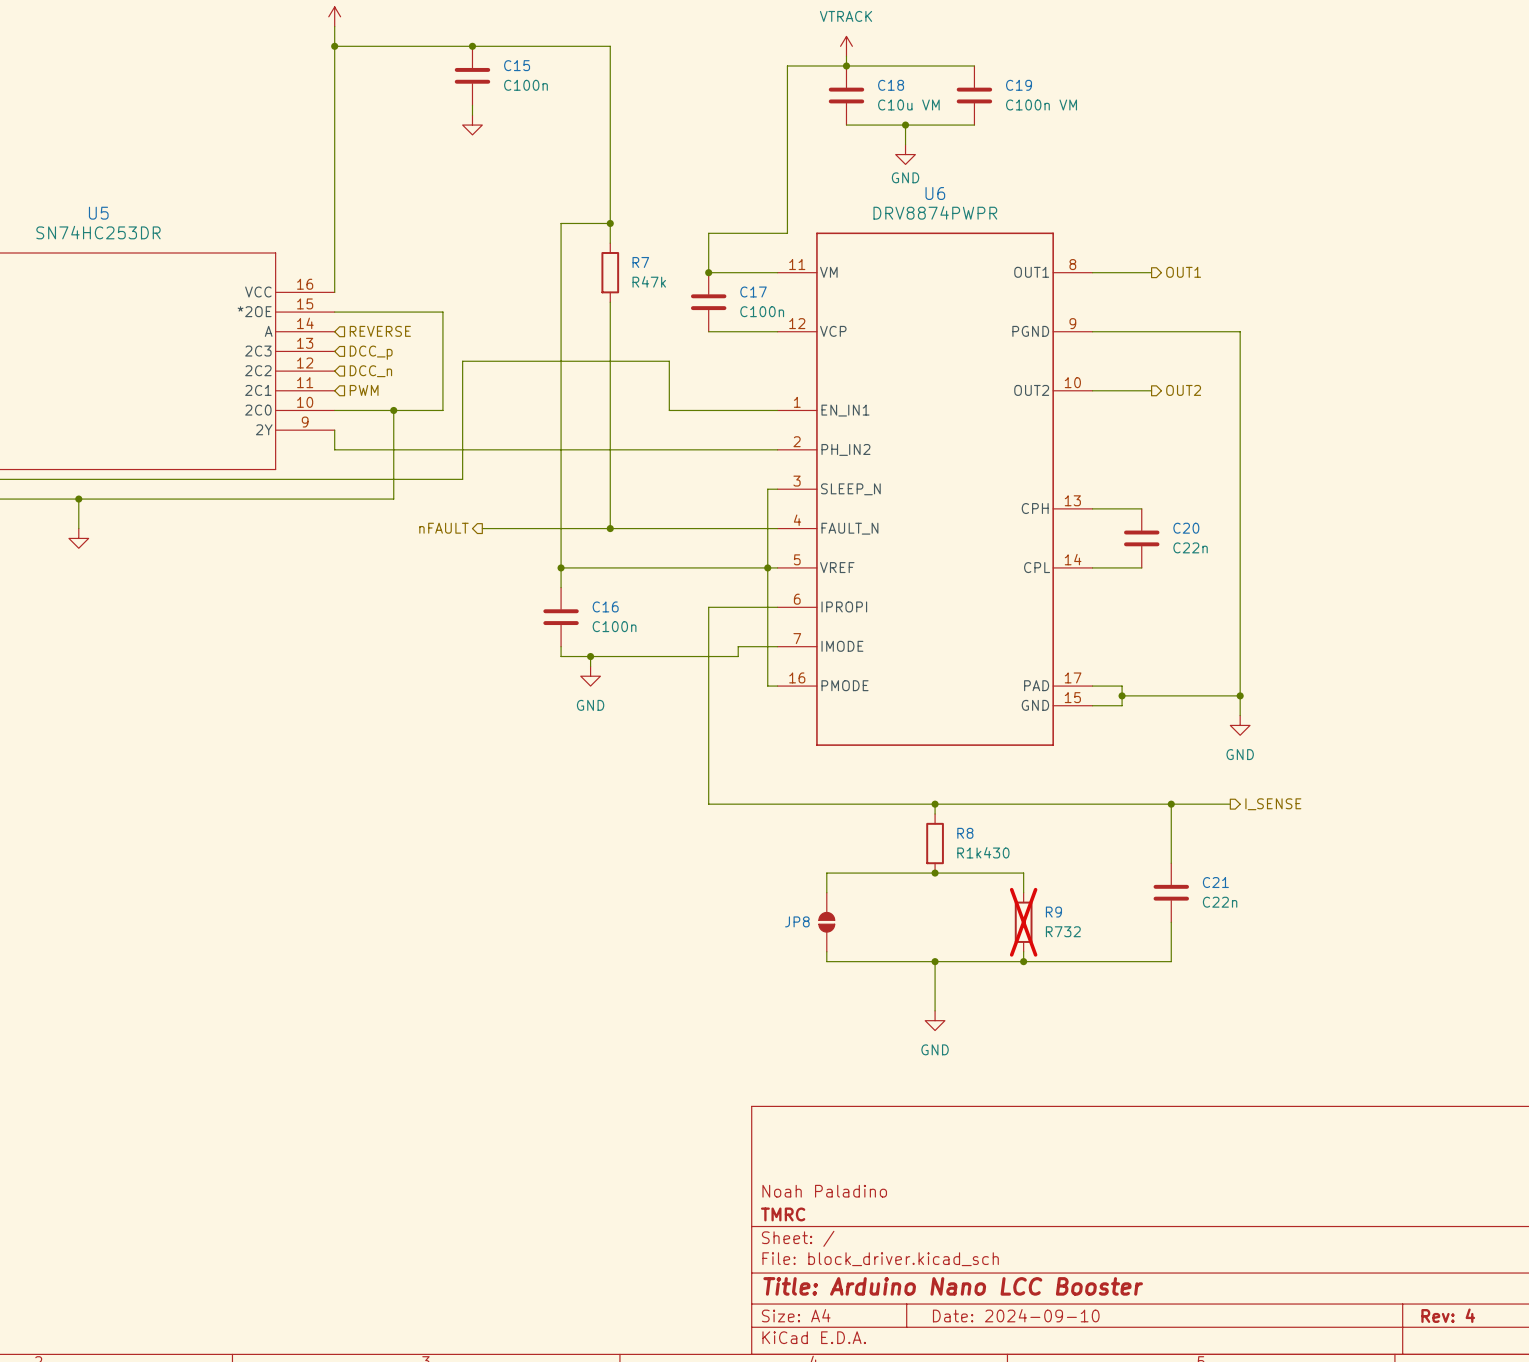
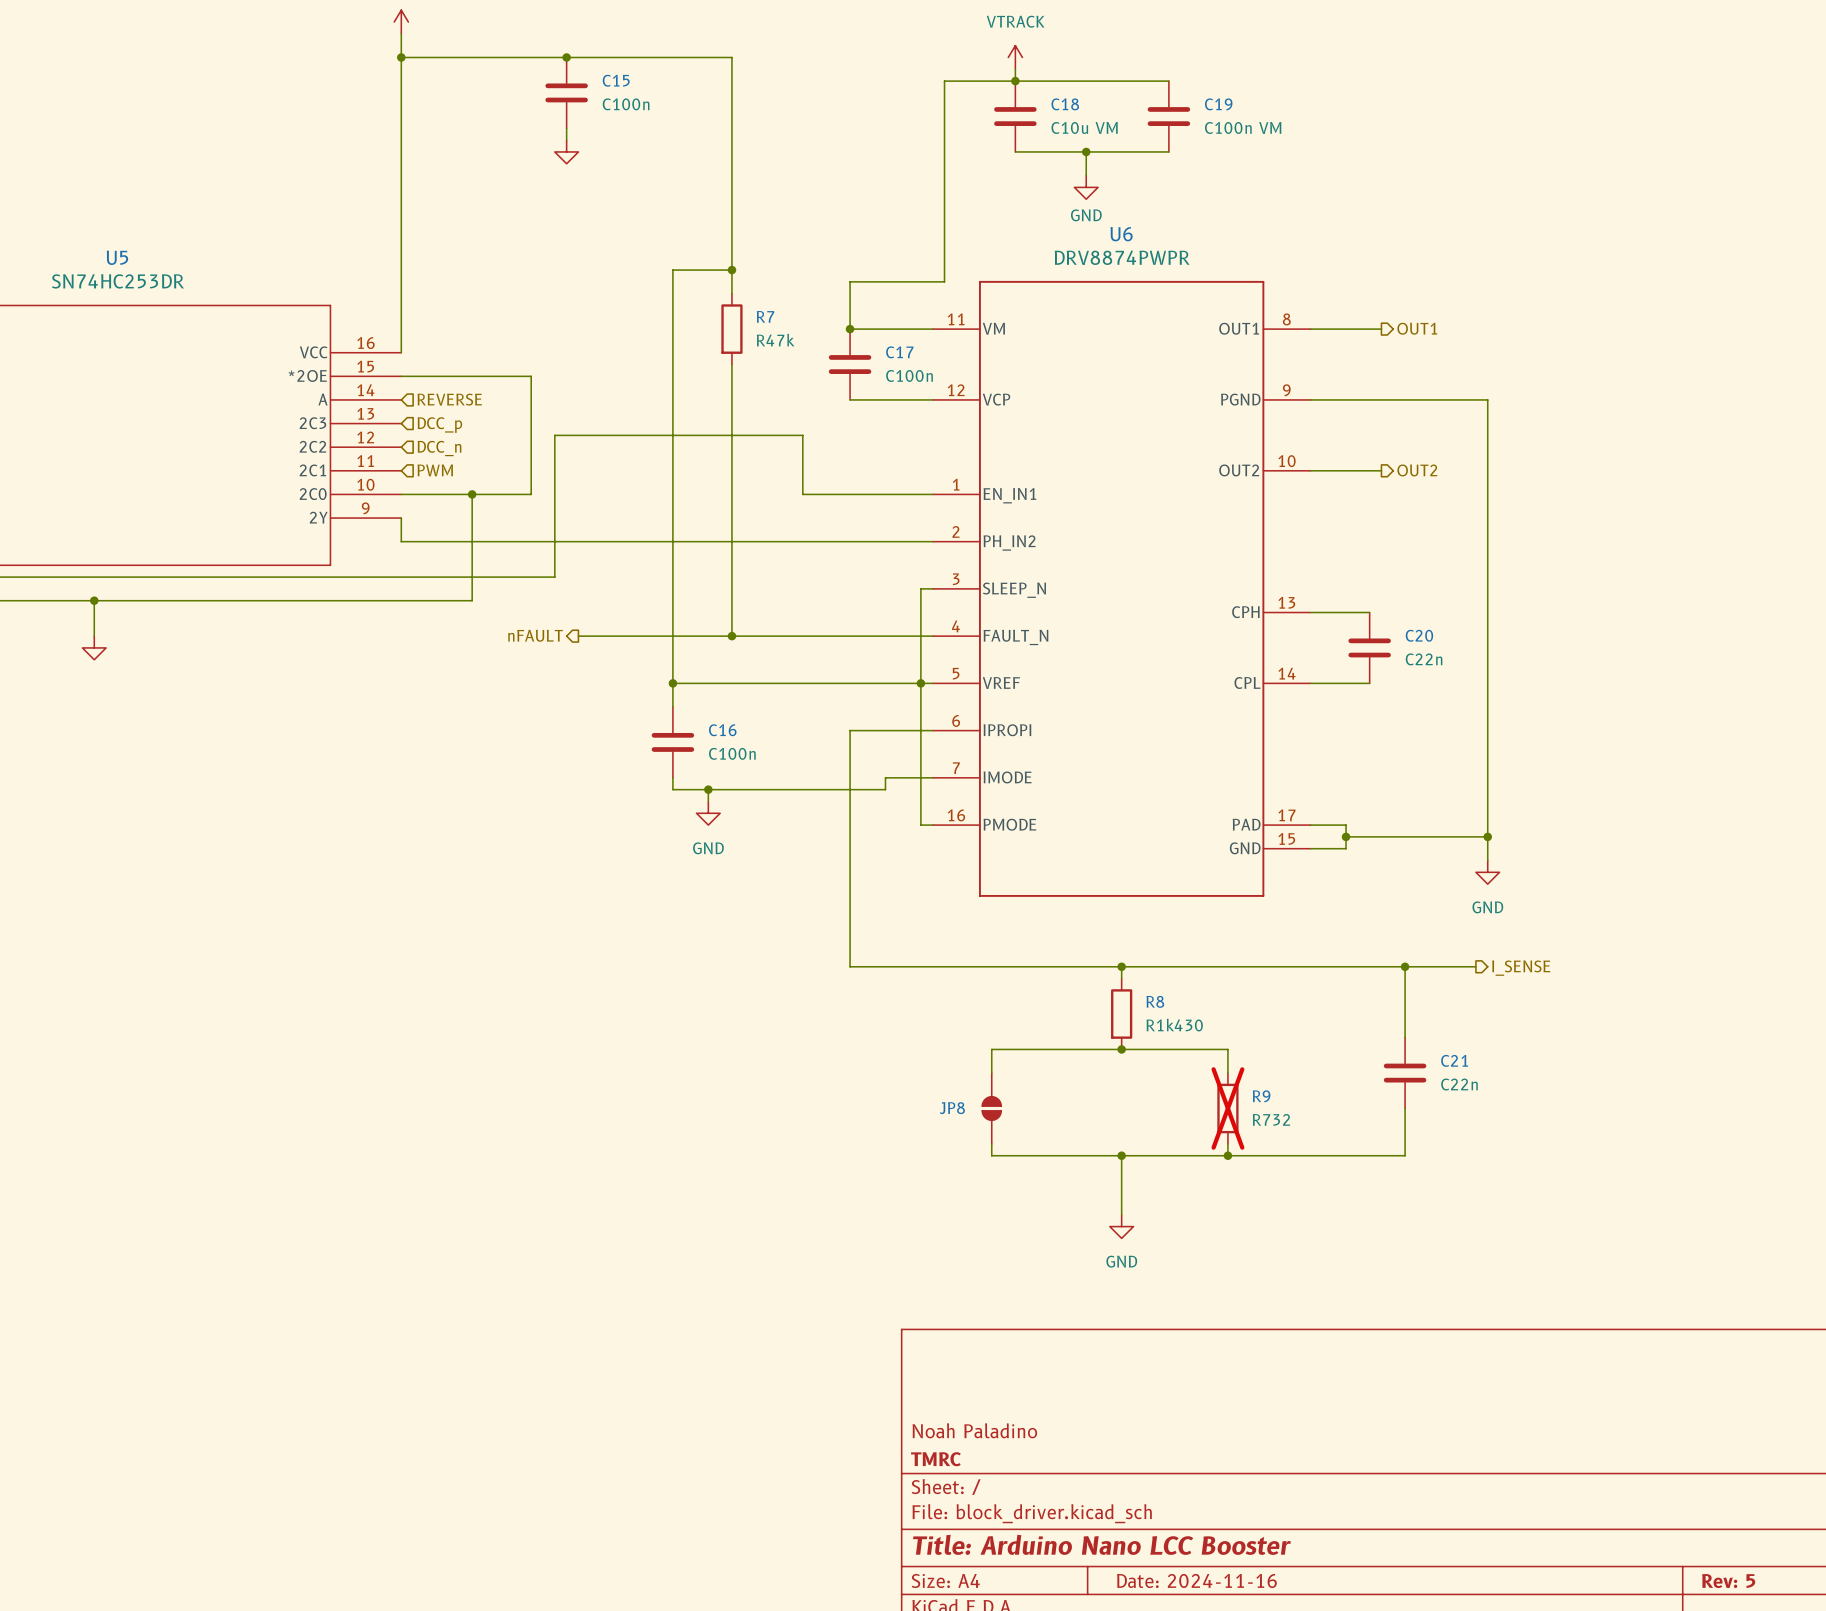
title block: Date: 2024-09-10 (1016, 1315) -> Date: 2024-11-16 (1196, 1580)
title block: Rev: 4 (1448, 1315) -> Rev: 5 (1728, 1581)

